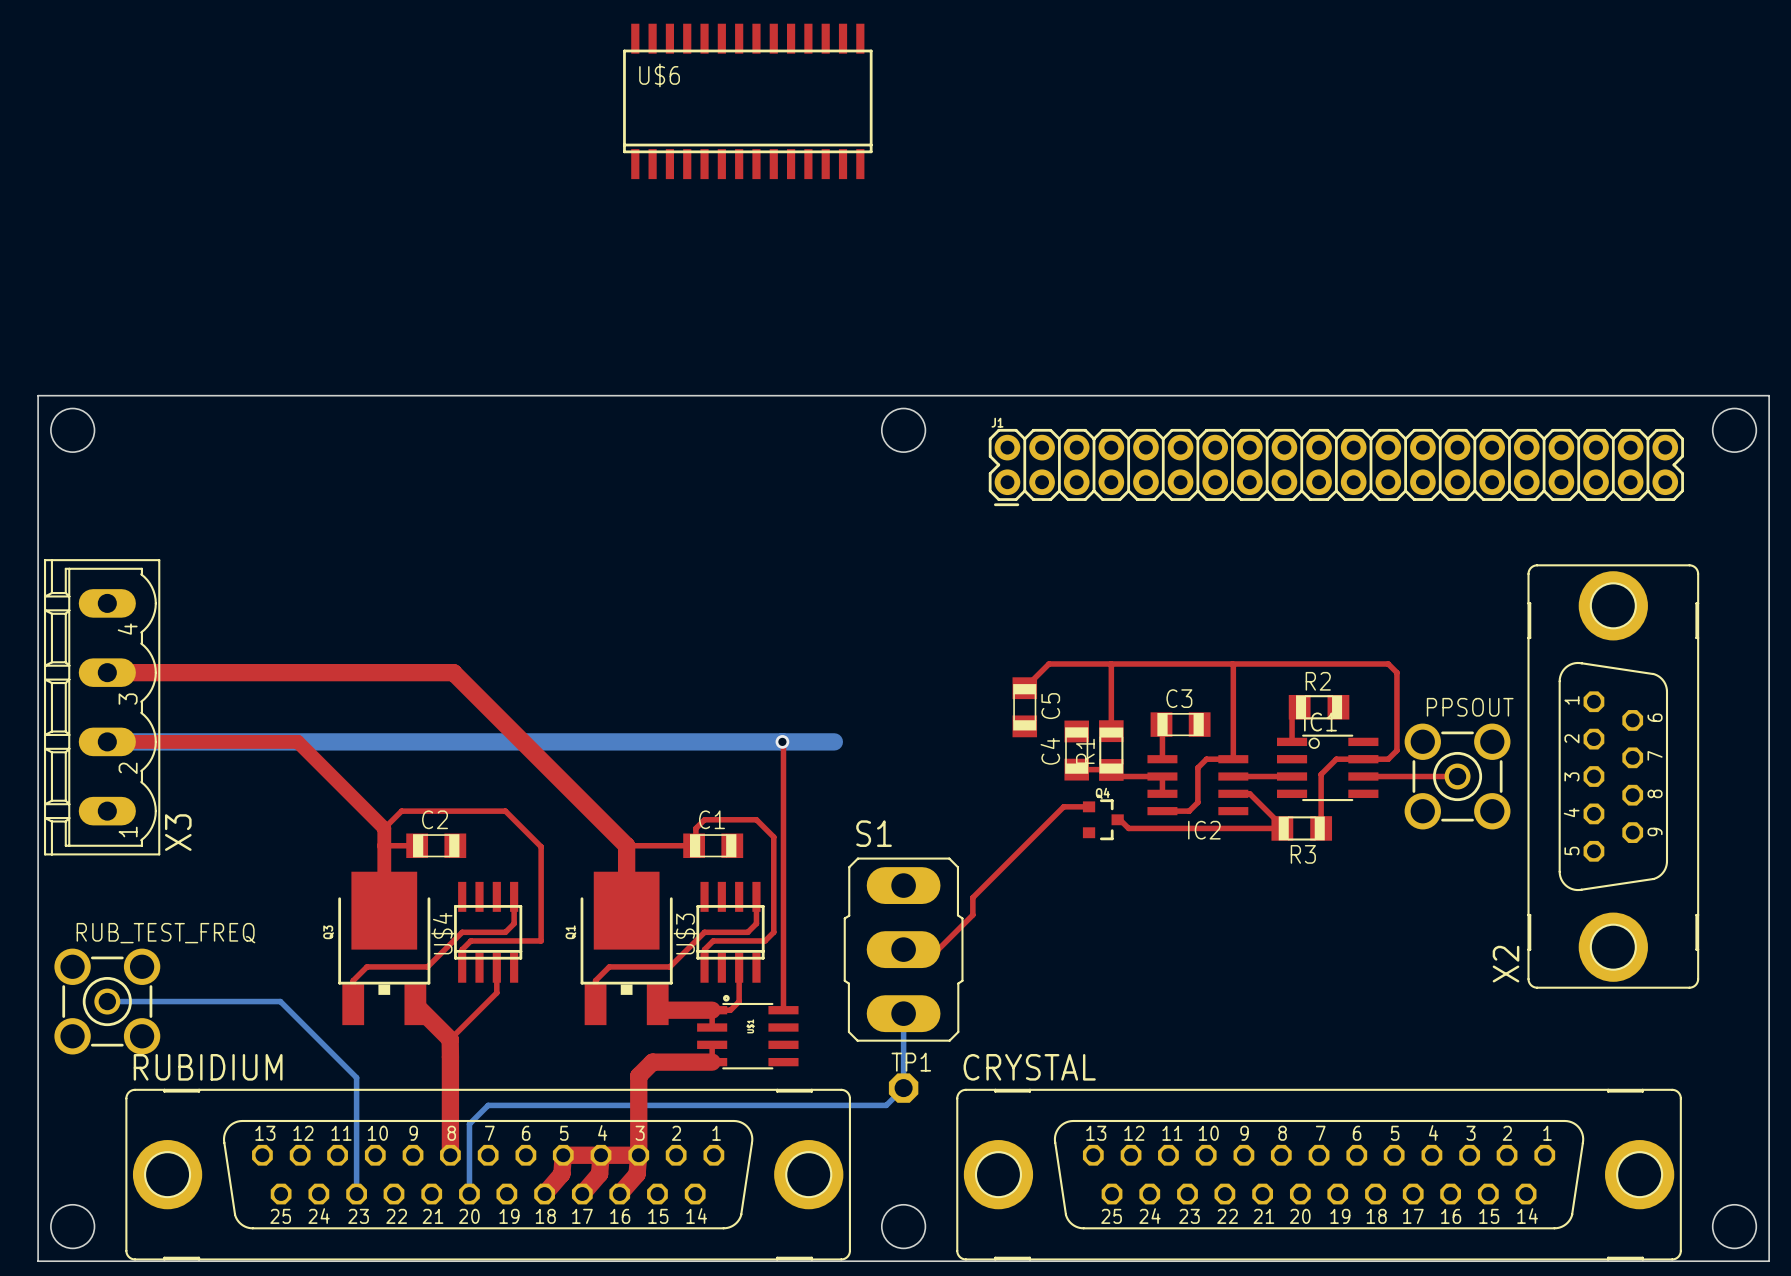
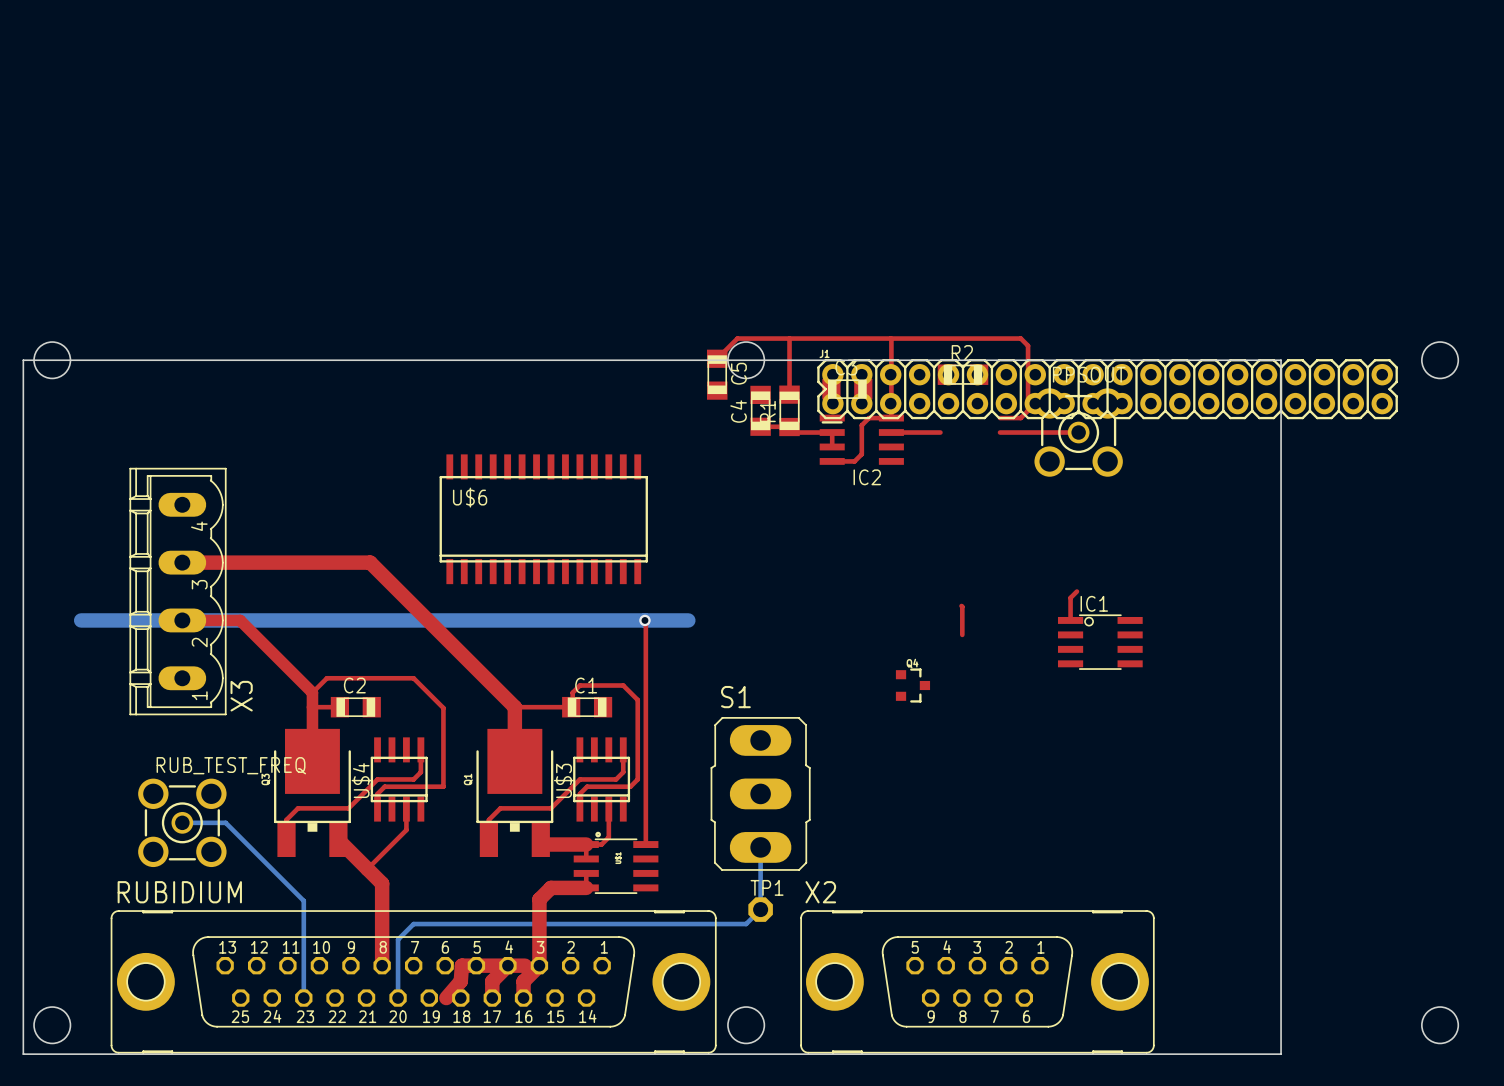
U$6 position: (747, 101) -> (543, 519)
top track: none -> (717, 358) (737, 338) (1020, 338) (1028, 345) (1028, 410) (1020, 418) (1000, 418)
board edge: (38, 430) (38, 395) (1769, 395) (1769, 1261) (1544, 1261) -> (23, 360) (1281, 360) (1281, 1054)
top track: (1111, 663) (1111, 731) -> (789, 338) (789, 394)
top track: (1232, 663) (1233, 759) (1206, 759) (1197, 767) (1197, 802) (1189, 811) (1162, 811) -> (890, 338) (891, 418) (869, 418) (861, 425) (861, 454) (854, 461) (832, 461)
top track: (107, 672) (228, 672) -> none
top track: (1024, 688) (1048, 663) (1388, 663) (1396, 672) (1396, 750) (1388, 759) (1336, 759) (1321, 774) (1321, 828) -> none
X3 position: (102, 707) -> (178, 591)
C5 position: (1024, 707) -> (717, 374)
R2 position: (1319, 707) -> (963, 374)
C3 position: (1180, 724) -> (847, 389)
top track: (107, 741) (228, 741) -> none
C4 position: (1076, 750) -> (760, 410)
R1 position: (1111, 750) -> (789, 410)
top track: (1076, 769) (1111, 769) (1117, 776) (1162, 776) (1162, 793) -> (760, 426) (789, 426) (795, 432) (832, 432) (832, 446)
top track: (1233, 776) (1292, 776) -> (891, 432) (940, 432)
top track: (1363, 776) (1457, 776) -> (1000, 432) (1078, 432)
PPSOUT position: (1457, 776) -> (1078, 432)
X2 rotation: 0° (1613, 776) -> 90° clockwise (977, 981)
X2 position: (1613, 776) -> (977, 981)
IC2 position: (1197, 785) -> (861, 439)
top track: (1233, 793) (1249, 793) (1282, 828) (1128, 828) (1117, 819) -> none
top track: (1089, 806) (1063, 806) (972, 897) (972, 914) (938, 949) (903, 949) -> none
R3: (1301, 828) -> none
S1 position: (903, 949) -> (760, 793)
bottom track: none -> (182, 822) (225, 822) (303, 900) (303, 998)
bottom track: (107, 1001) (280, 1001) (356, 1077) (356, 1194) -> none
RUB_TEST_FREQ position: (107, 1001) -> (182, 822)
bottom track: (903, 1013) (903, 1088) (886, 1105) -> (760, 847) (760, 909) (746, 924) (731, 924)
top track: (450, 1039) (450, 1155) -> (367, 869) (382, 883) (382, 965)
top track: (669, 1062) (652, 1062) (638, 1075) (637, 1174) (619, 1194) -> (551, 887) (539, 899) (539, 965) (523, 981) (523, 998)
TP1 position: (903, 1088) -> (760, 909)
bottom track: (505, 1105) (488, 1105) (469, 1124) (469, 1194) -> (413, 924) (398, 939) (398, 998)
top track: (601, 1155) (599, 1173) (582, 1194) -> none
top track: none -> (507, 965) (492, 981) (492, 998)
RUBIDIUM position: (488, 1174) -> (413, 981)
CRYSTAL: (1319, 1174) -> none

